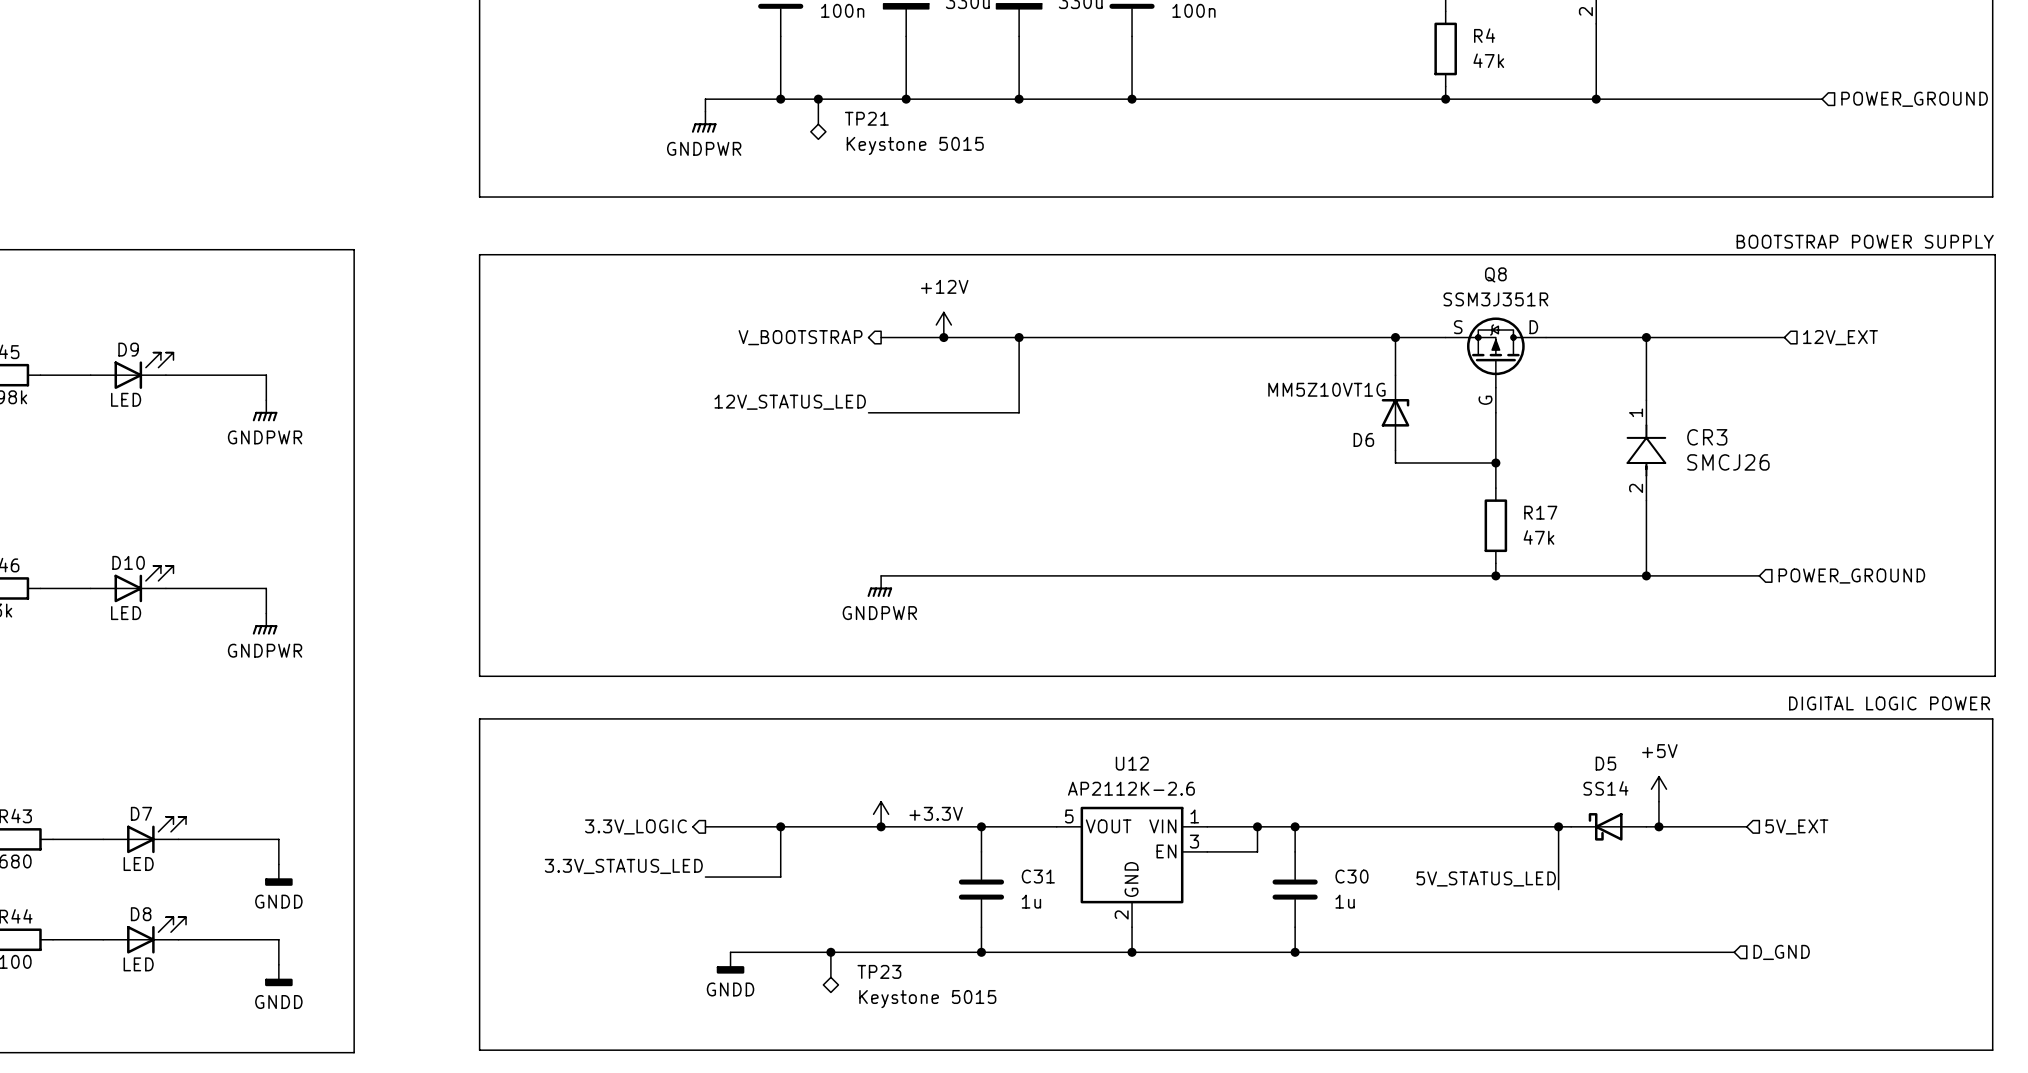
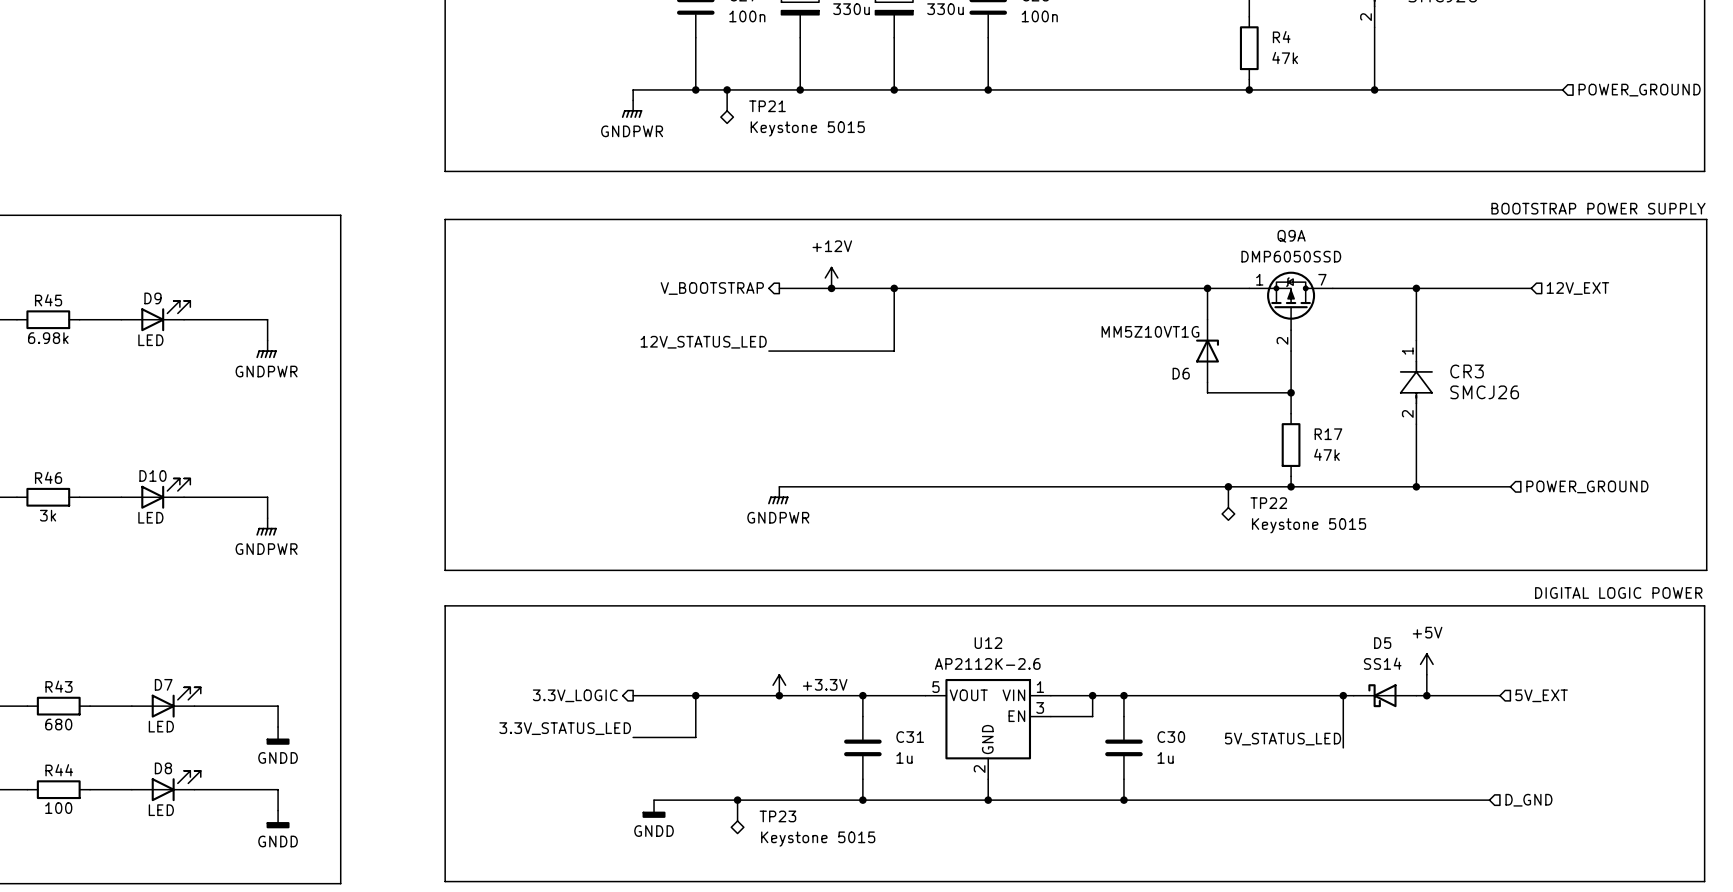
Q8 name: Q8 (1495, 274) -> Q9A (1291, 236)
Q8 value: SSM3J351R (1495, 299) -> DMP6050SSD (1291, 256)
Q8 pin name: S (1458, 327) -> none
Q8 pin number: none -> 1 (1259, 279)
Q8 pin name: D (1533, 327) -> none
Q8 pin number: none -> 7 (1322, 279)
Q8 pin name: G (1485, 400) -> none
Q8 pin number: none -> 2 (1282, 340)
junction: none -> (1228, 486)
TP22: none -> Keystone 5015 (1228, 503)

